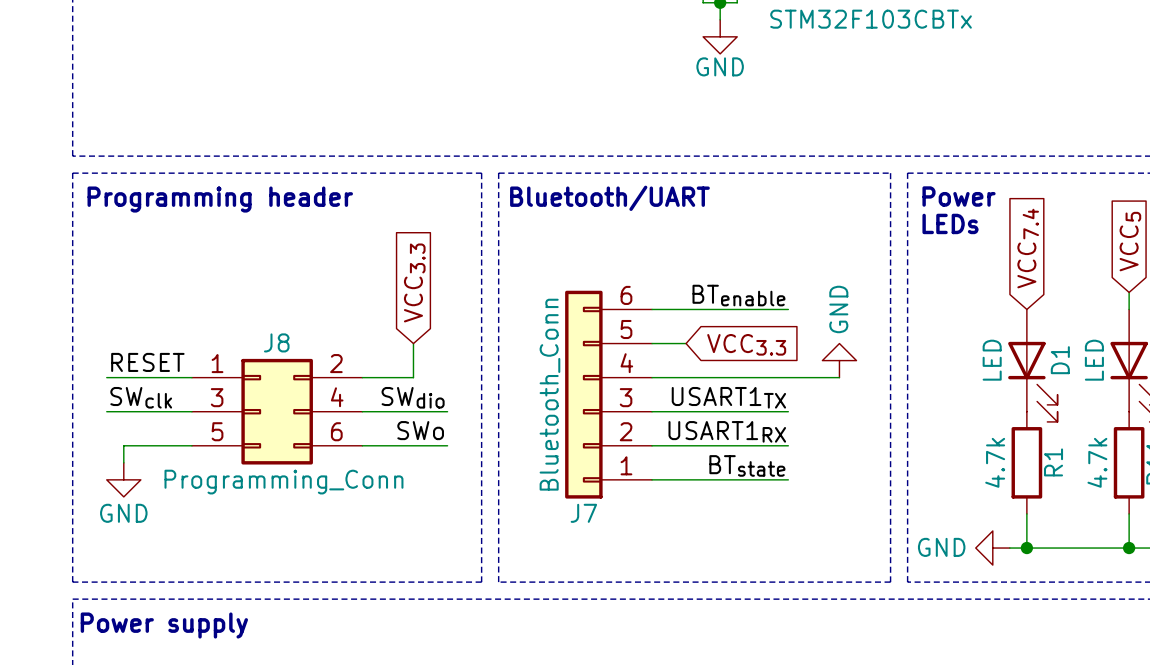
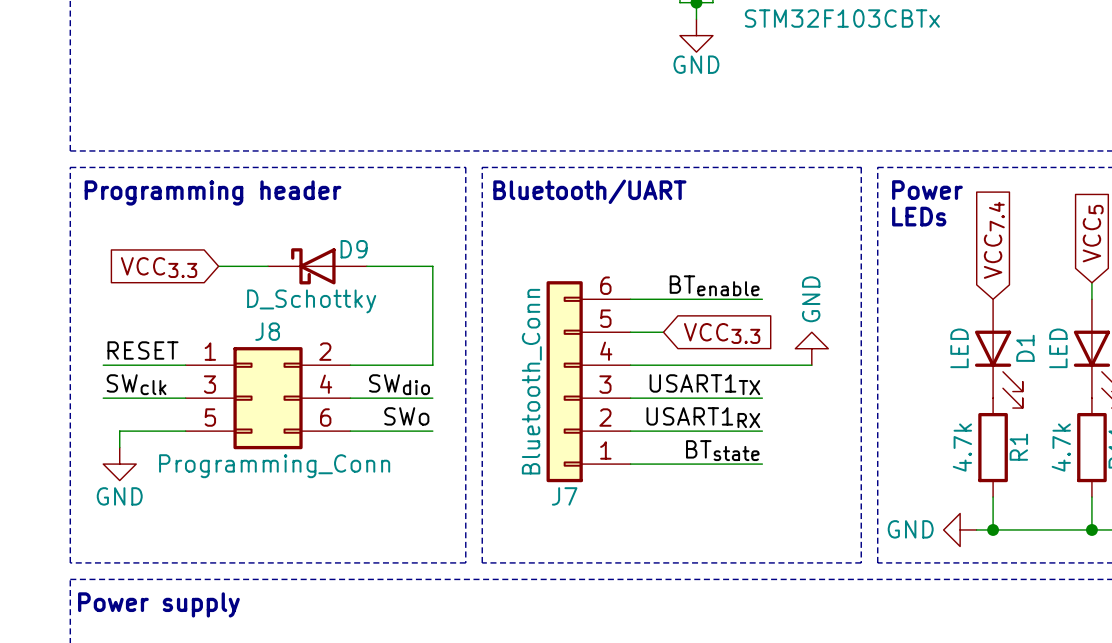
wire: none -> (218, 266) (268, 266)
D9: none -> D_Schottky (317, 266)
global label rotation: 0° (414, 282) -> 90° counterclockwise (159, 267)
global label position: VCC3.3 (414, 282) -> VCC3.3 (159, 267)
wire: (413, 343) (413, 377) -> (366, 266) (432, 266) (432, 365) (399, 365)

